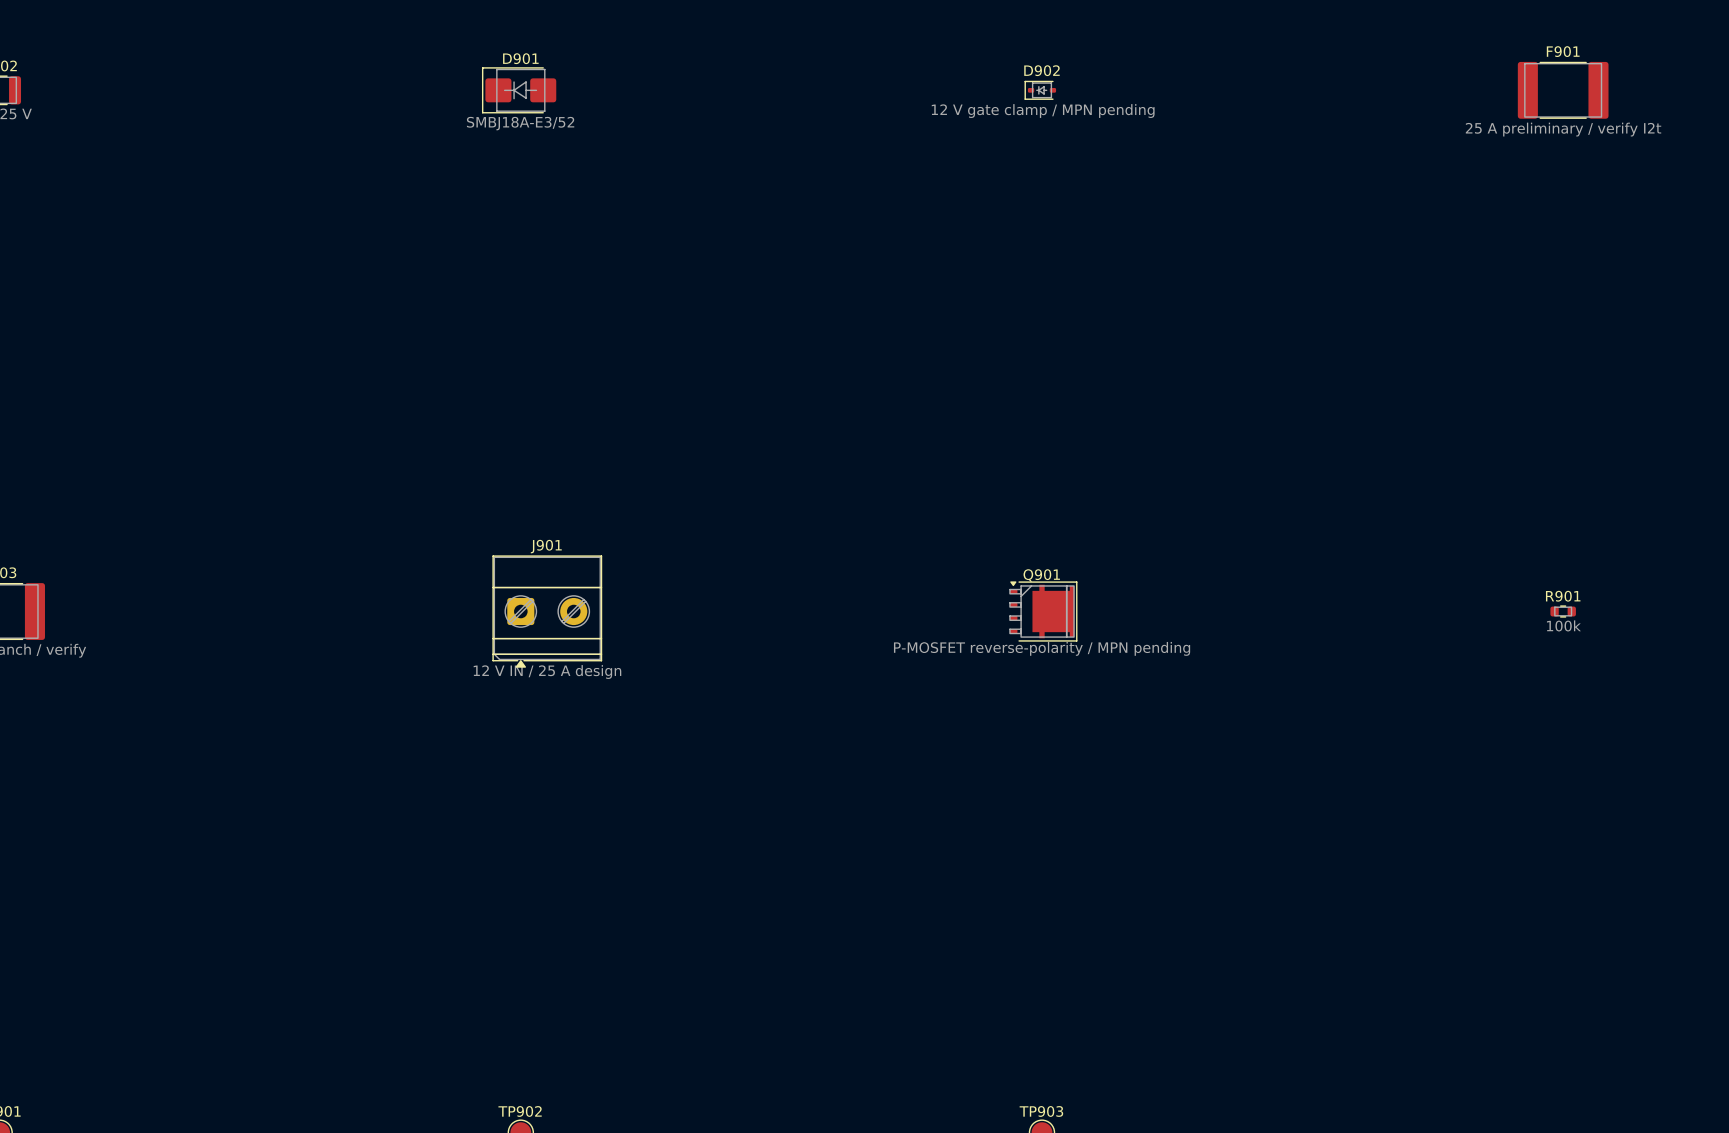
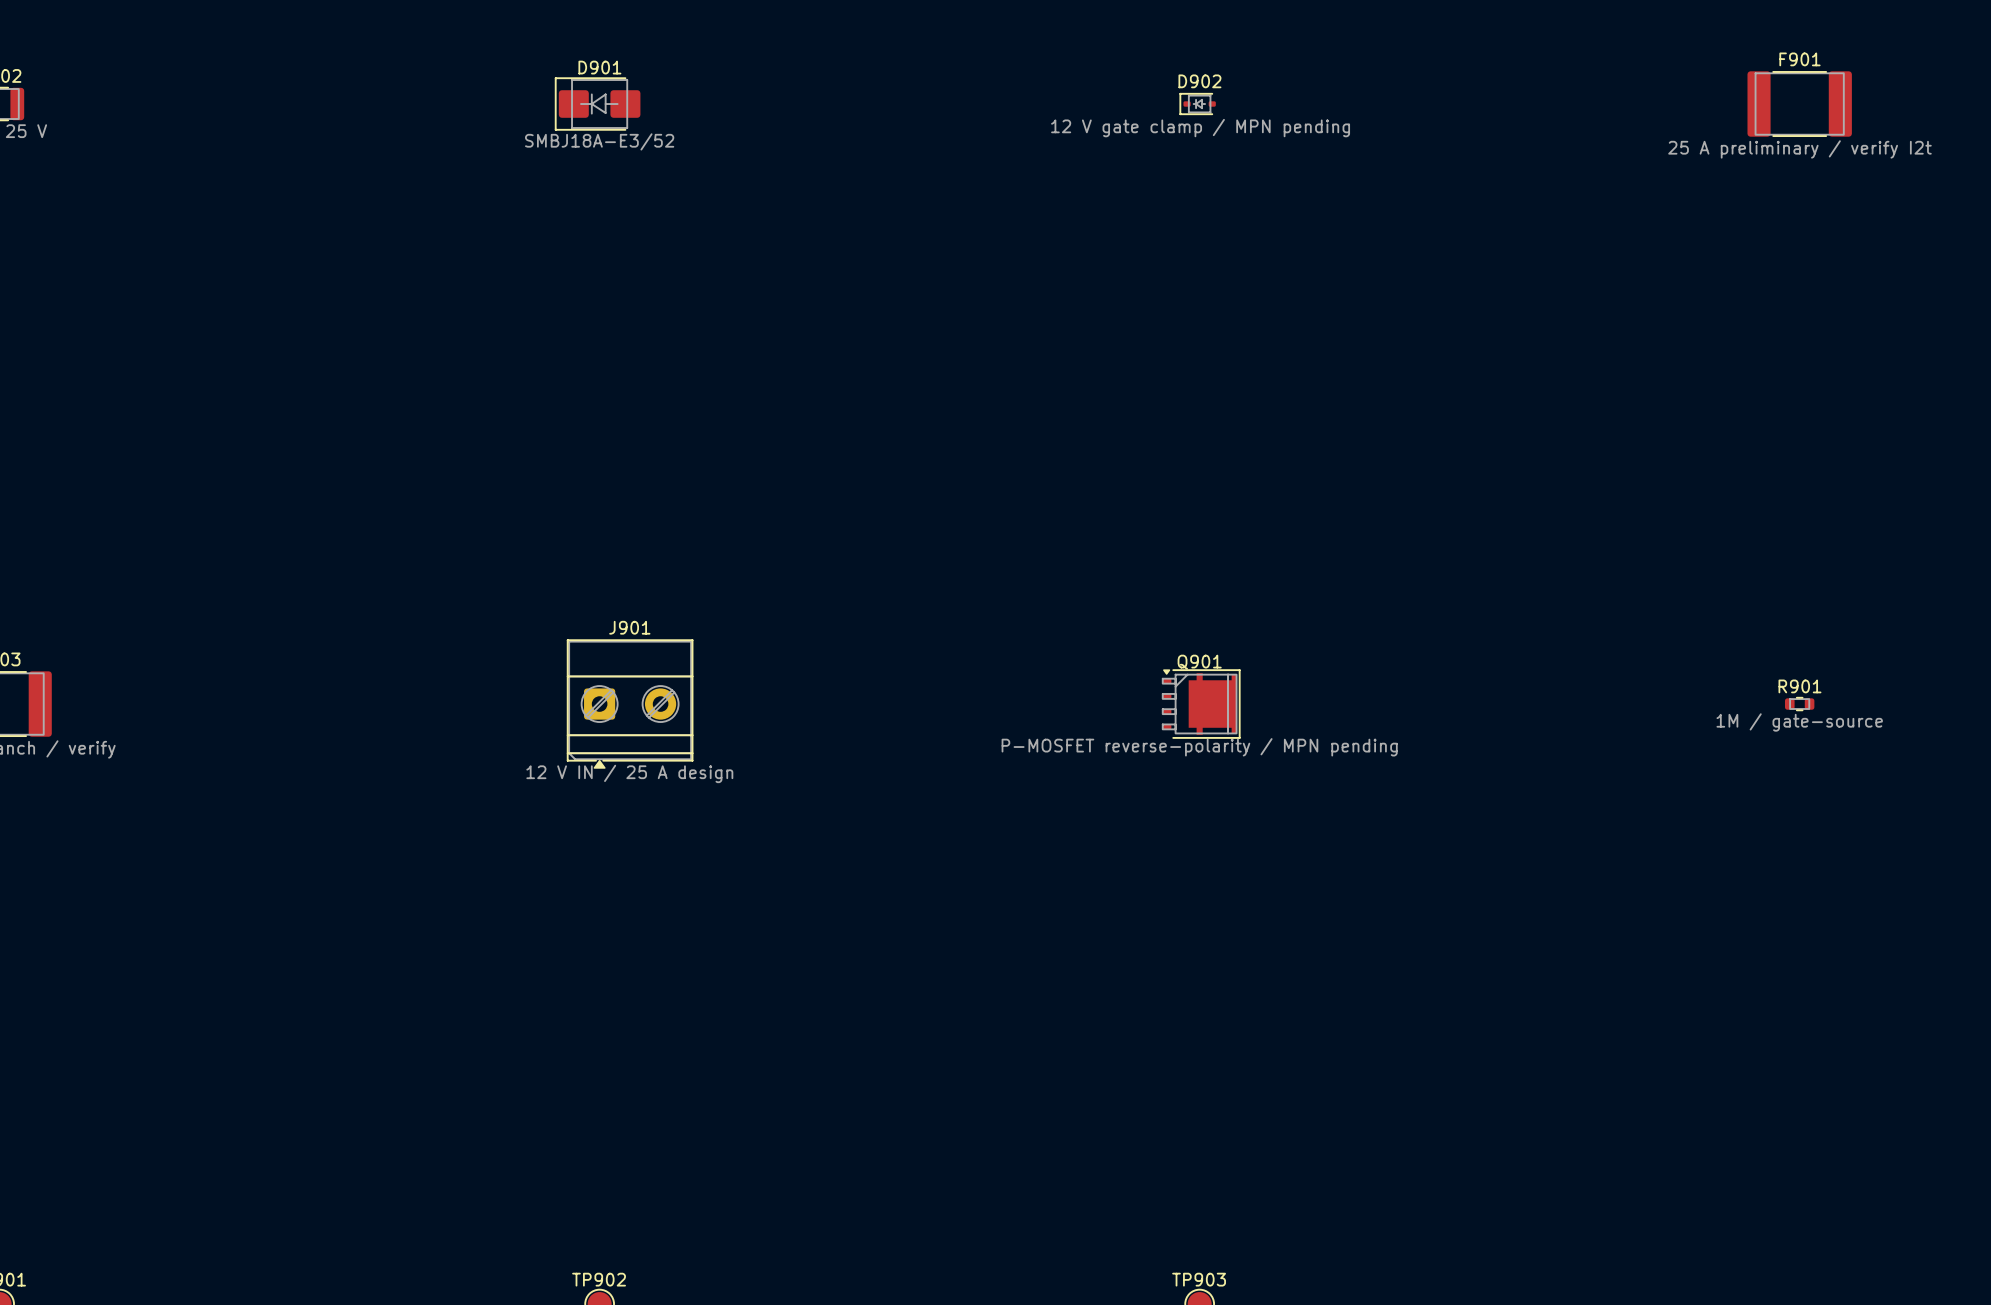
R901 value: 100k (1563, 625) -> 1M / gate-source (1799, 722)

